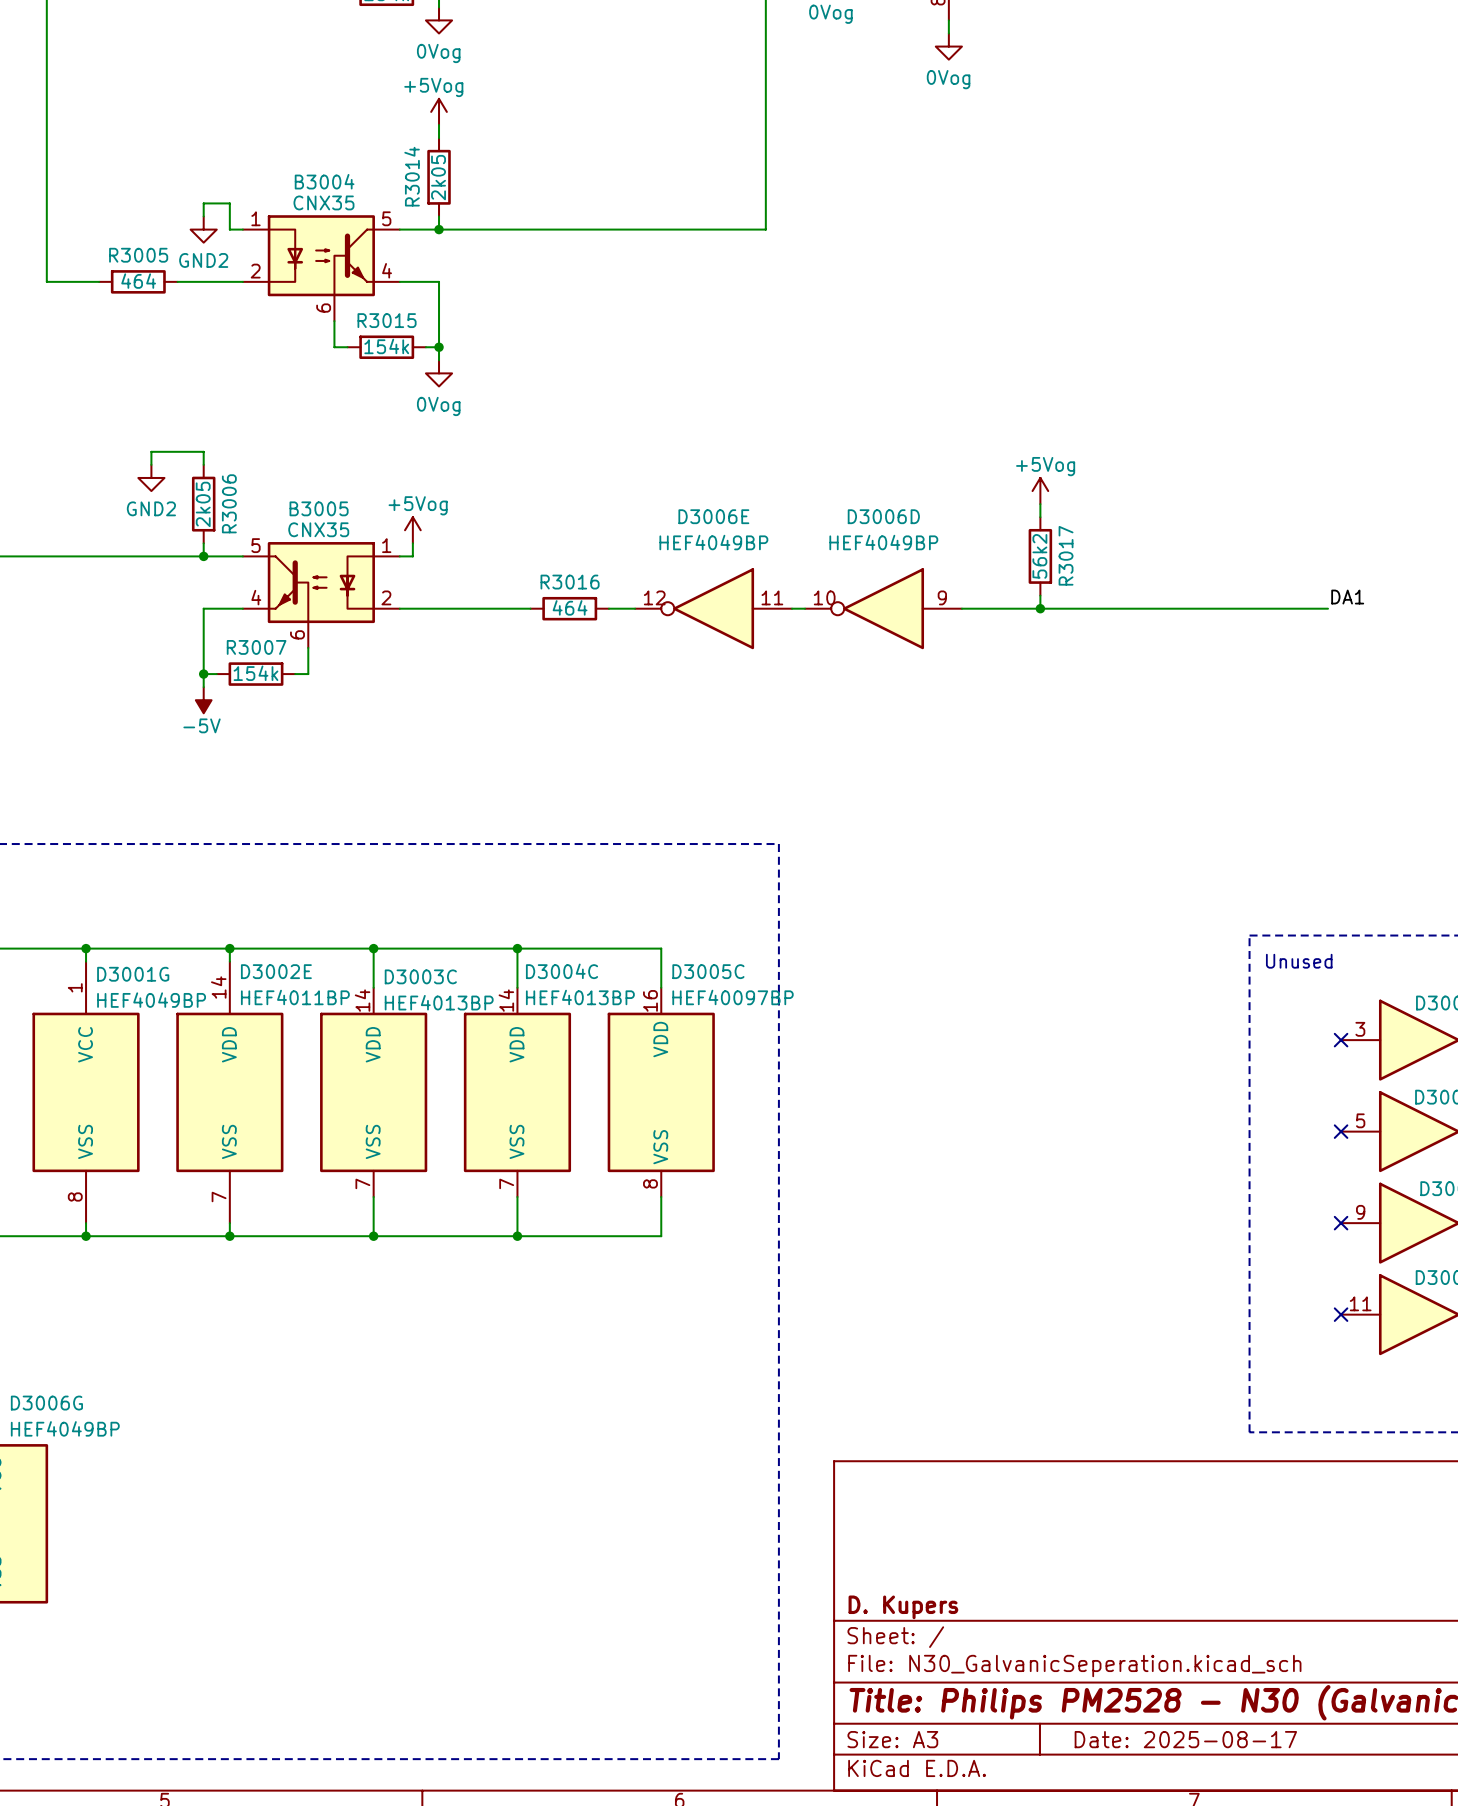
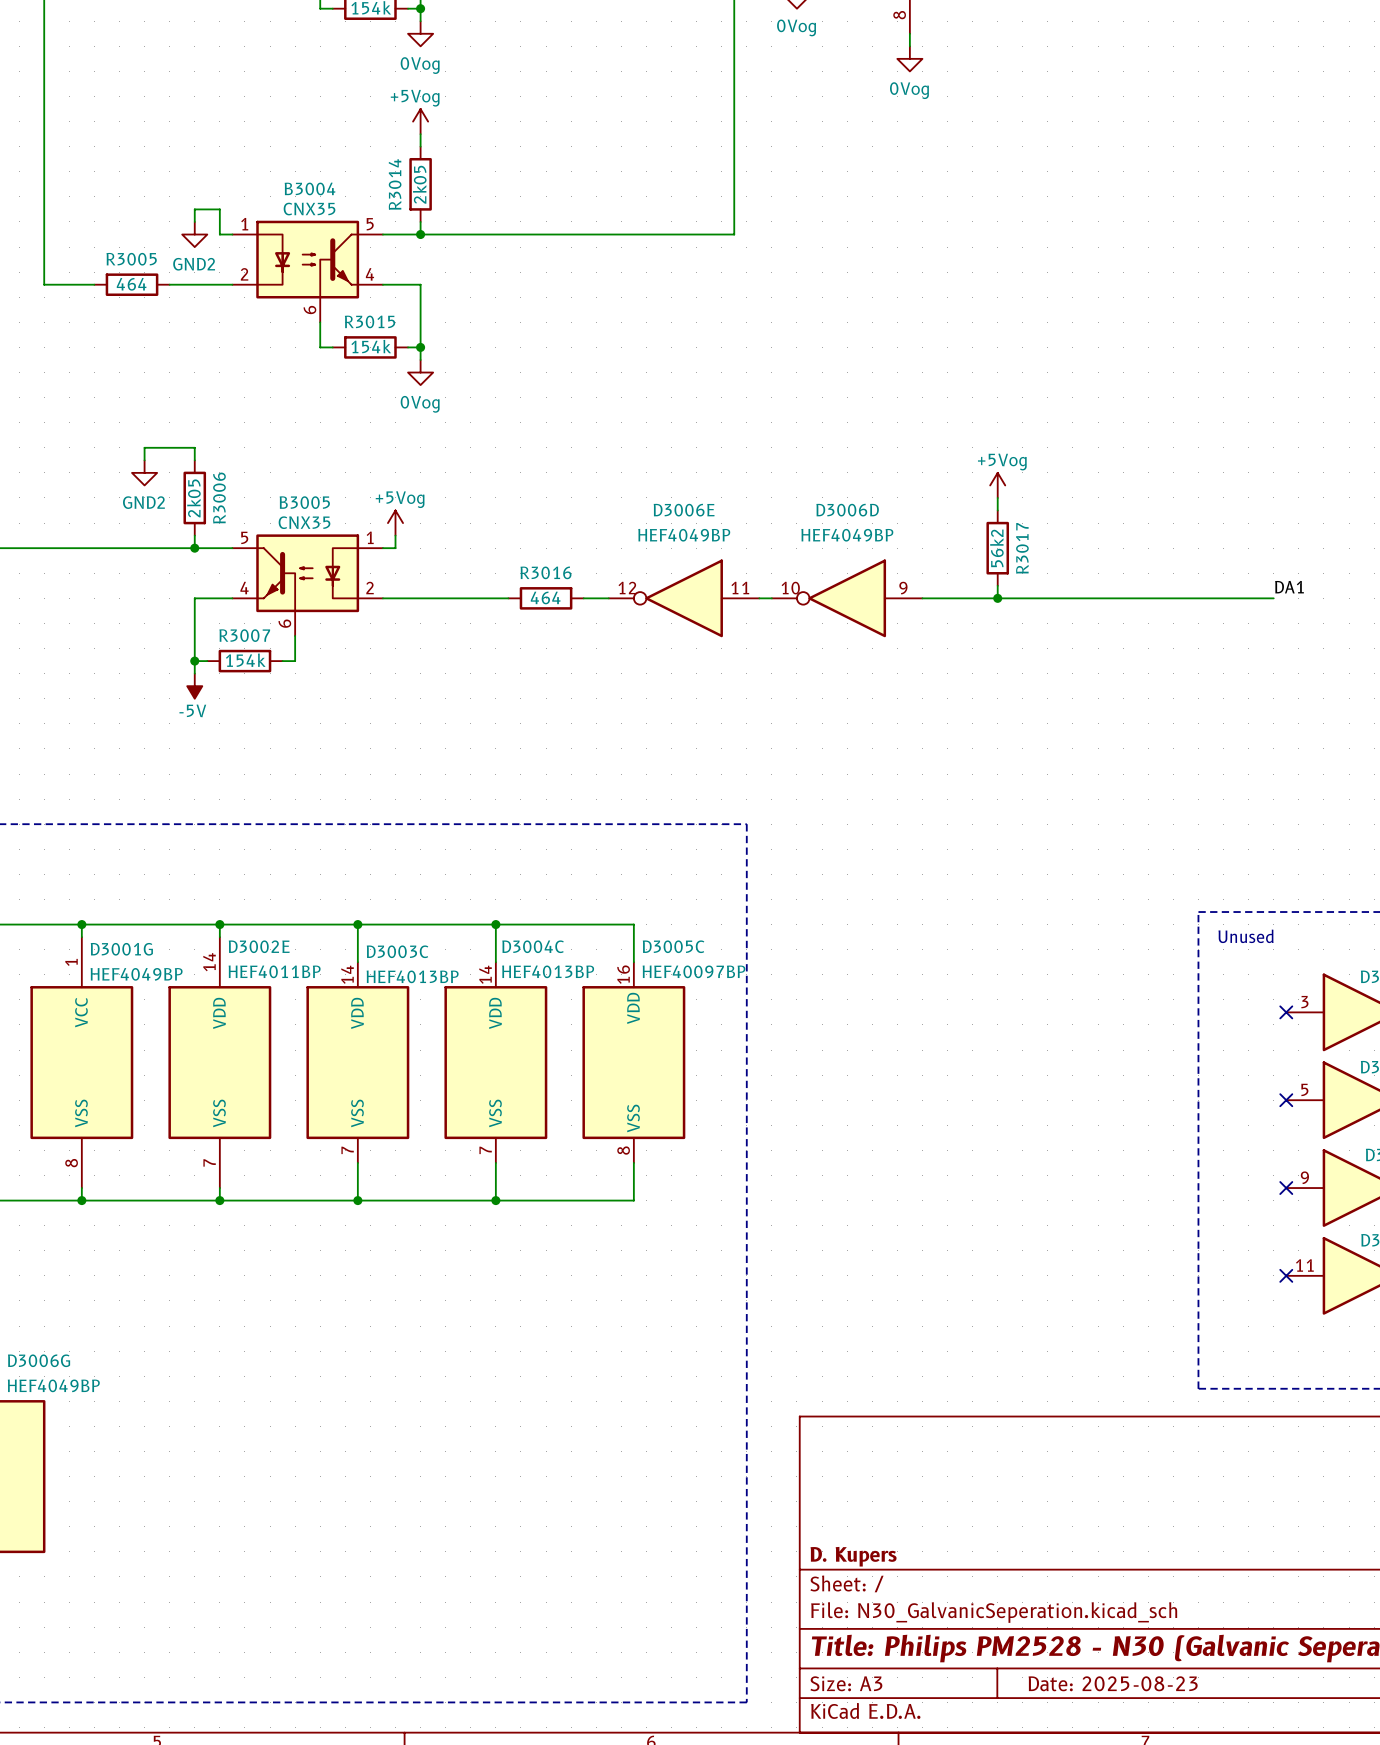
title block: Date: 2025-08-17 (1185, 1739) -> Date: 2025-08-23 (1113, 1683)

